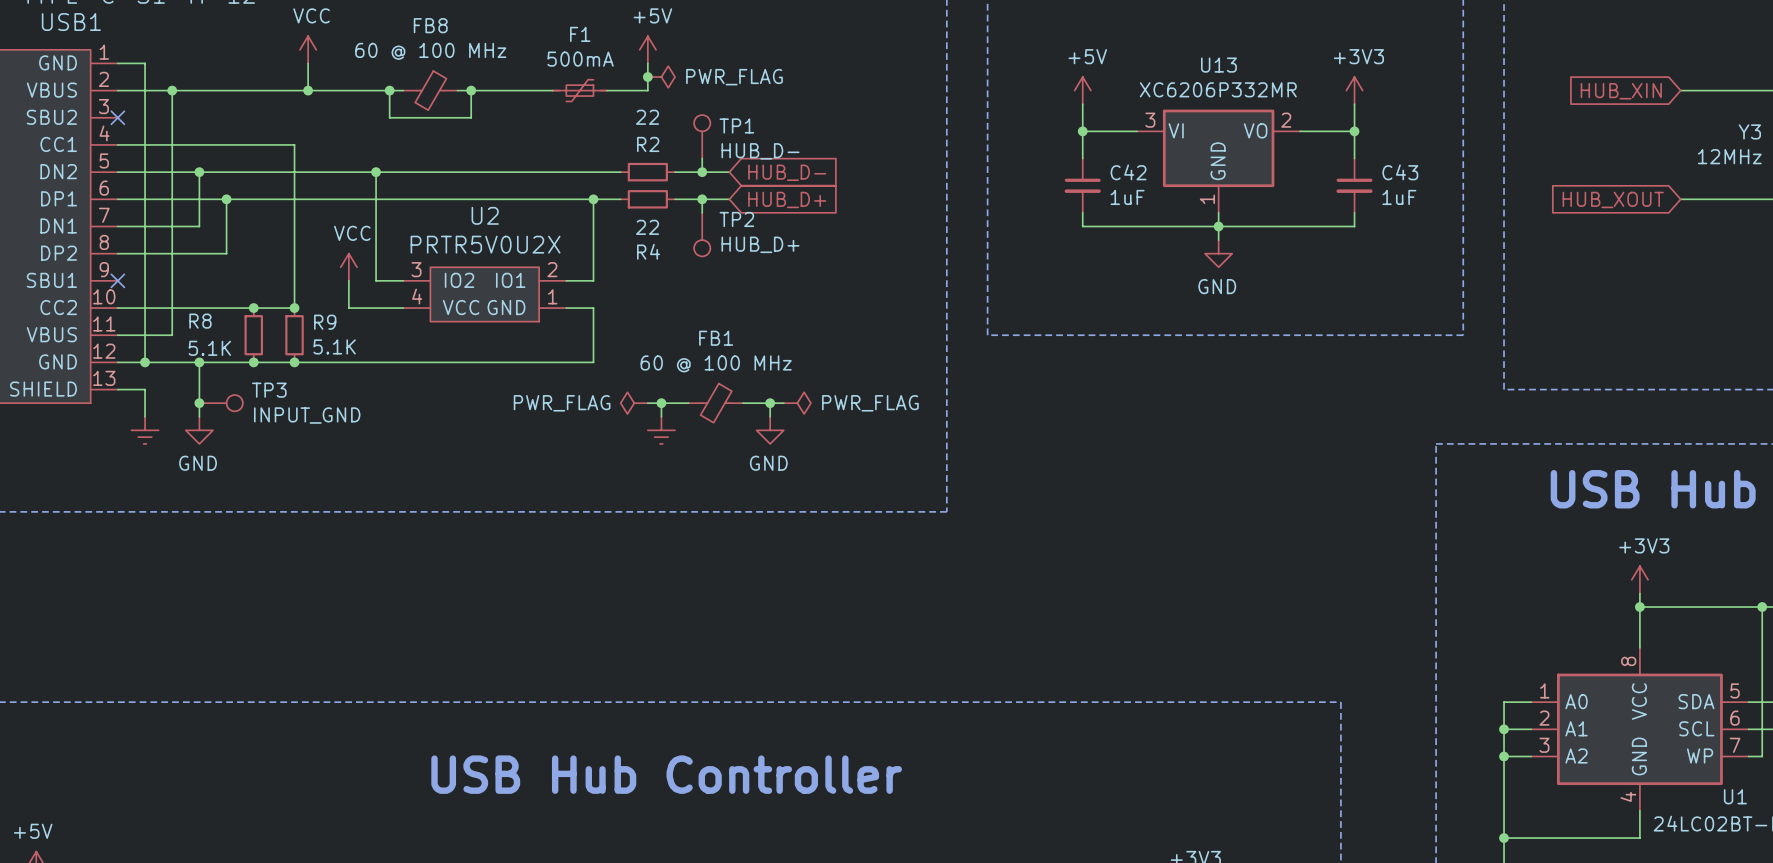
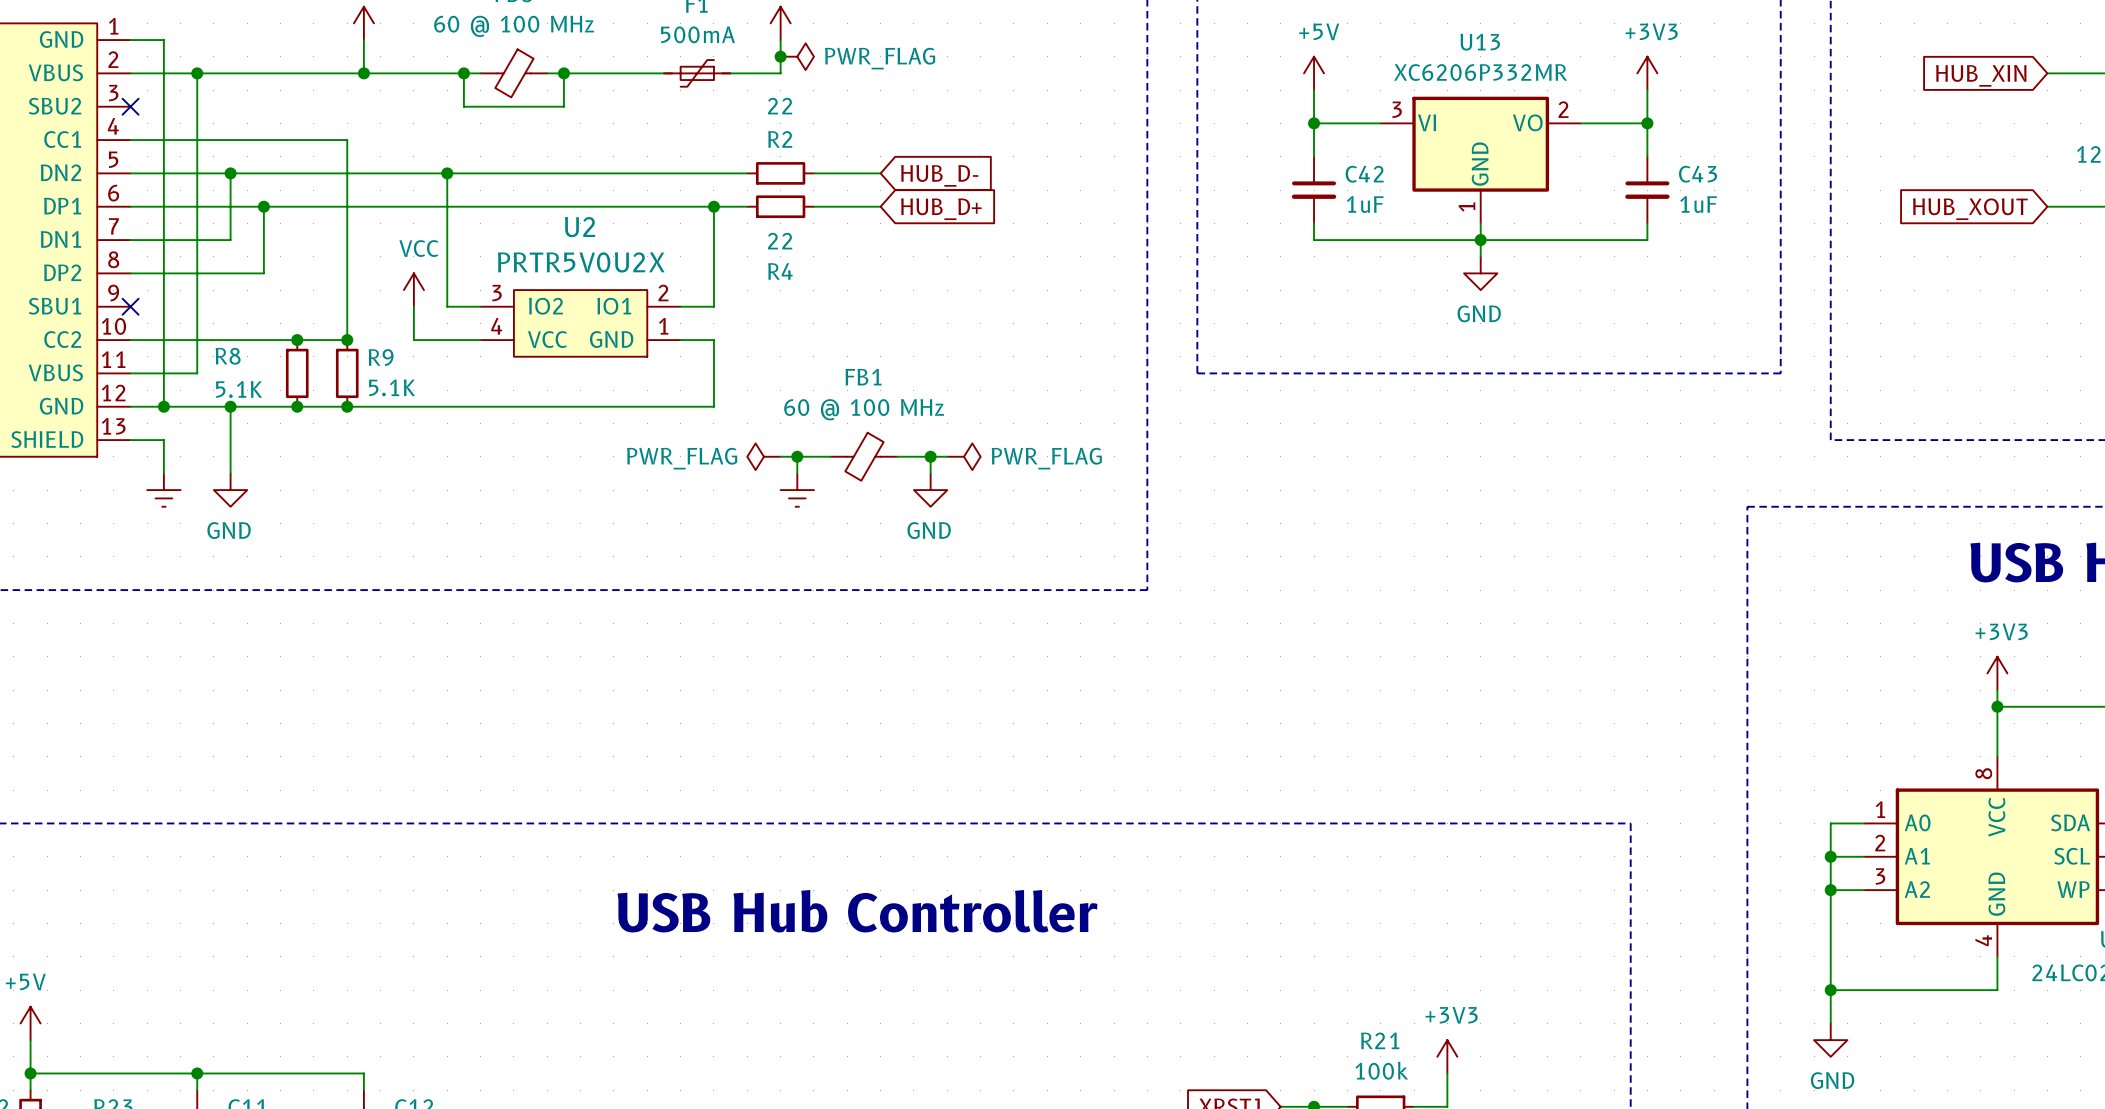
TP1: HUB_D- (702, 136) -> none
wire: (702, 158) (702, 172) -> none
junction: (702, 172) -> none
wire: (702, 199) (702, 212) -> none
junction: (702, 199) -> none
TP2: HUB_D+ (702, 234) -> none
junction: (199, 403) -> none
TP3: INPUT_GND (221, 403) -> none

